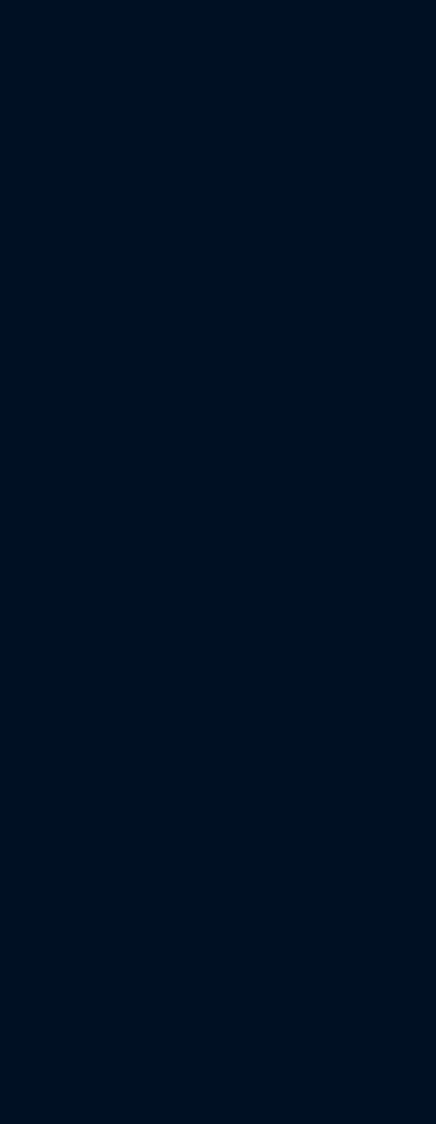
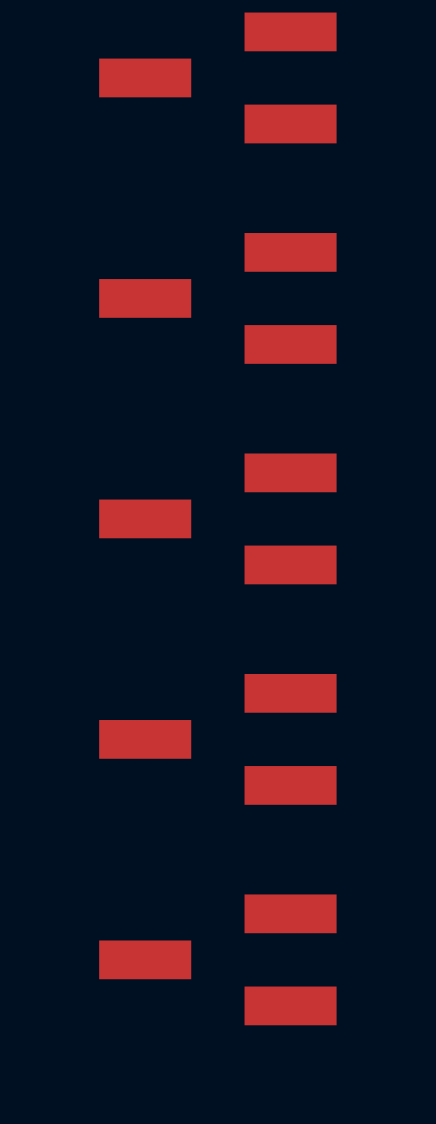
part: none -> (217, 77)
part: none -> (217, 298)
part: none -> (217, 518)
part: none -> (217, 739)
part: none -> (217, 959)

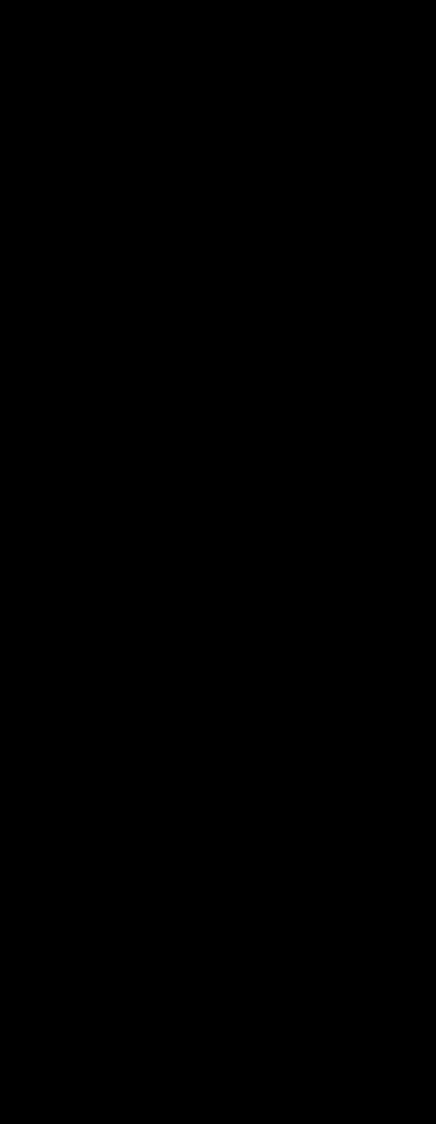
part: (217, 77) -> none
part: (217, 298) -> none
part: (217, 518) -> none
part: (217, 739) -> none
part: (217, 959) -> none

